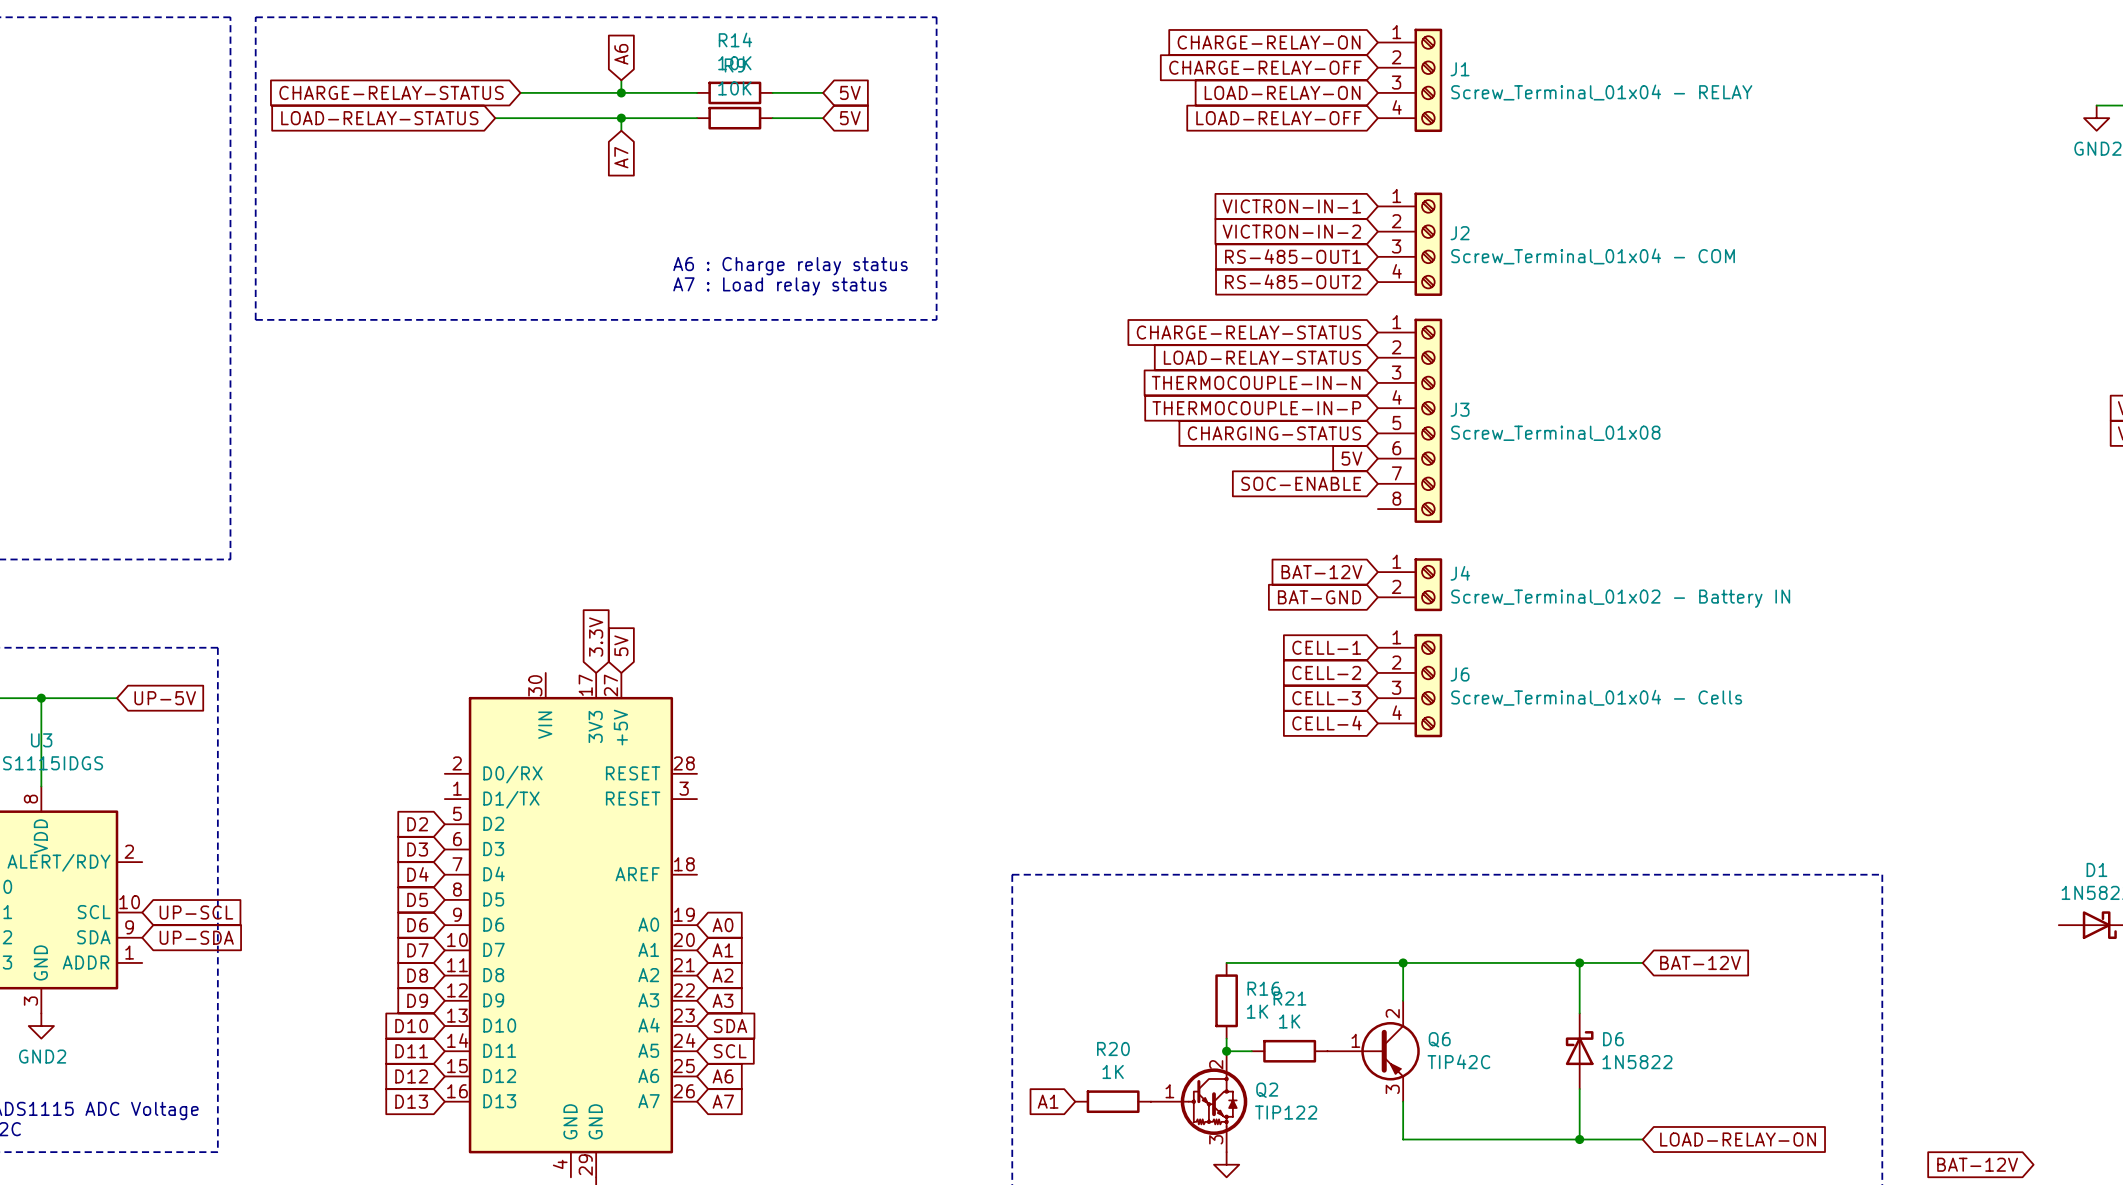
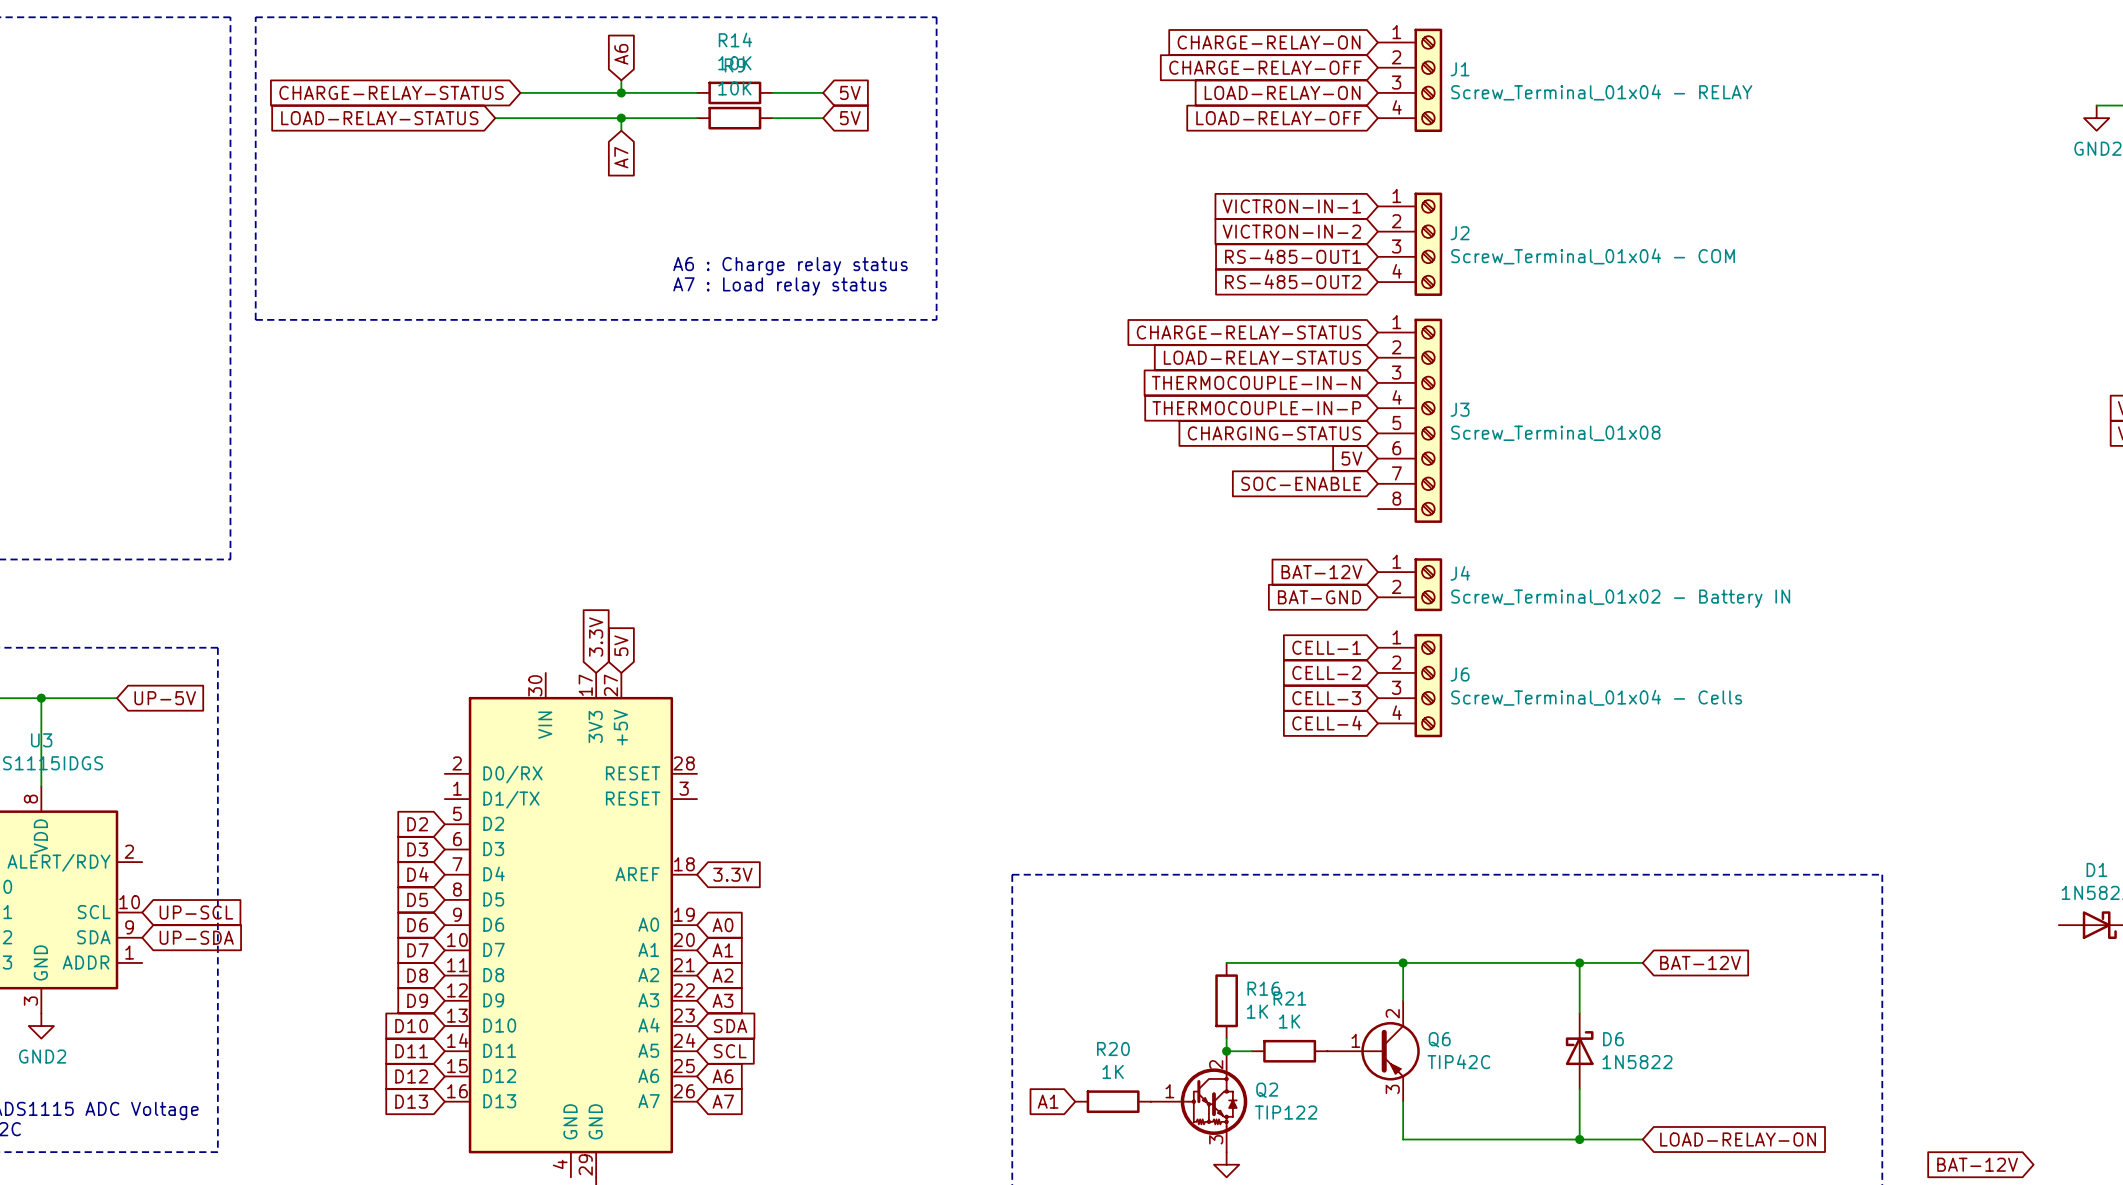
global label: none -> 3.3V (732, 874)

